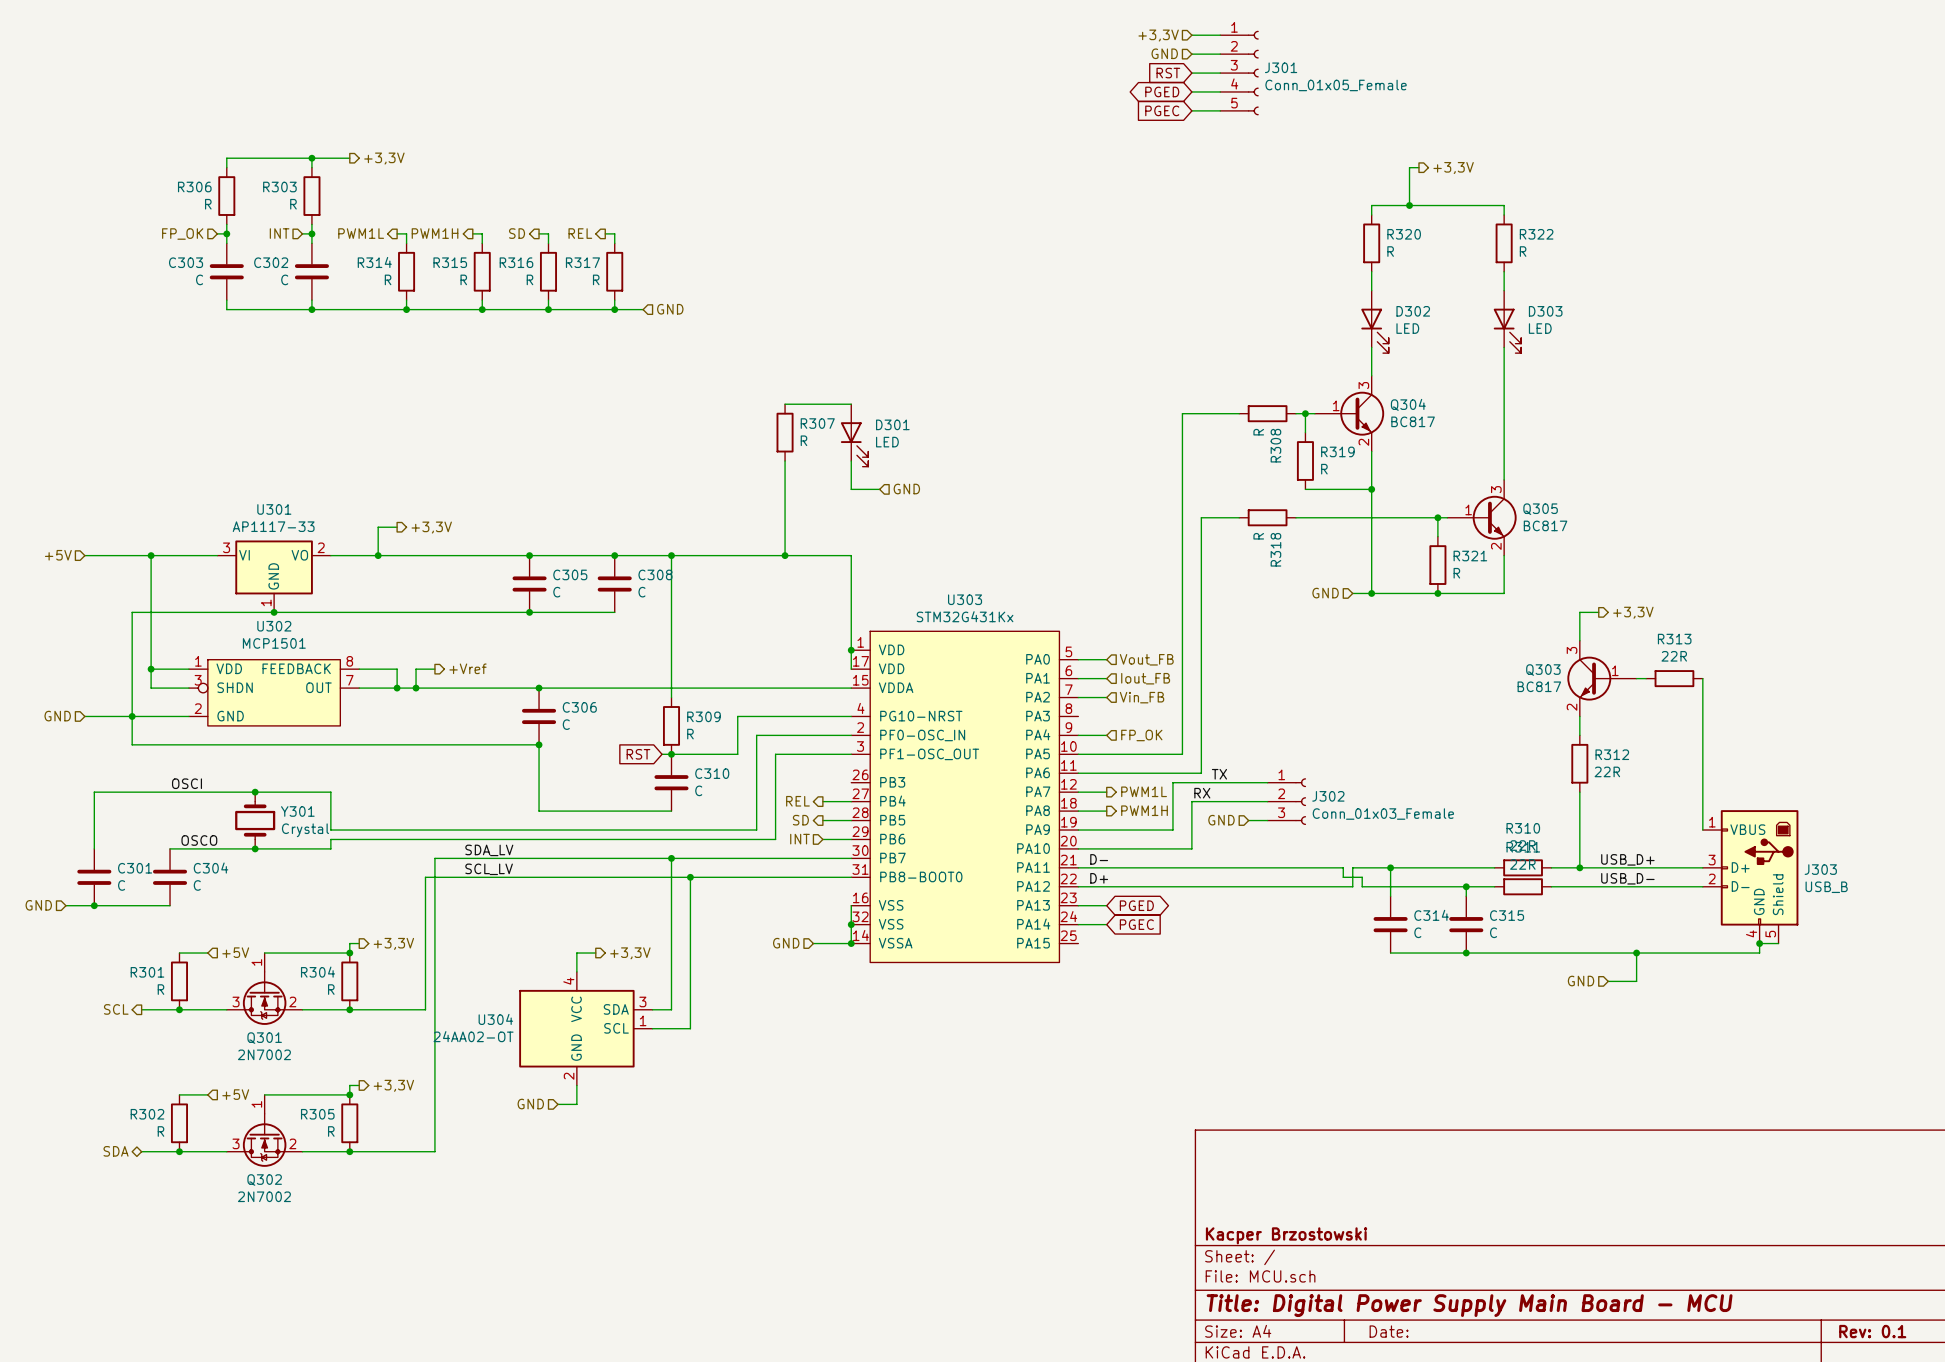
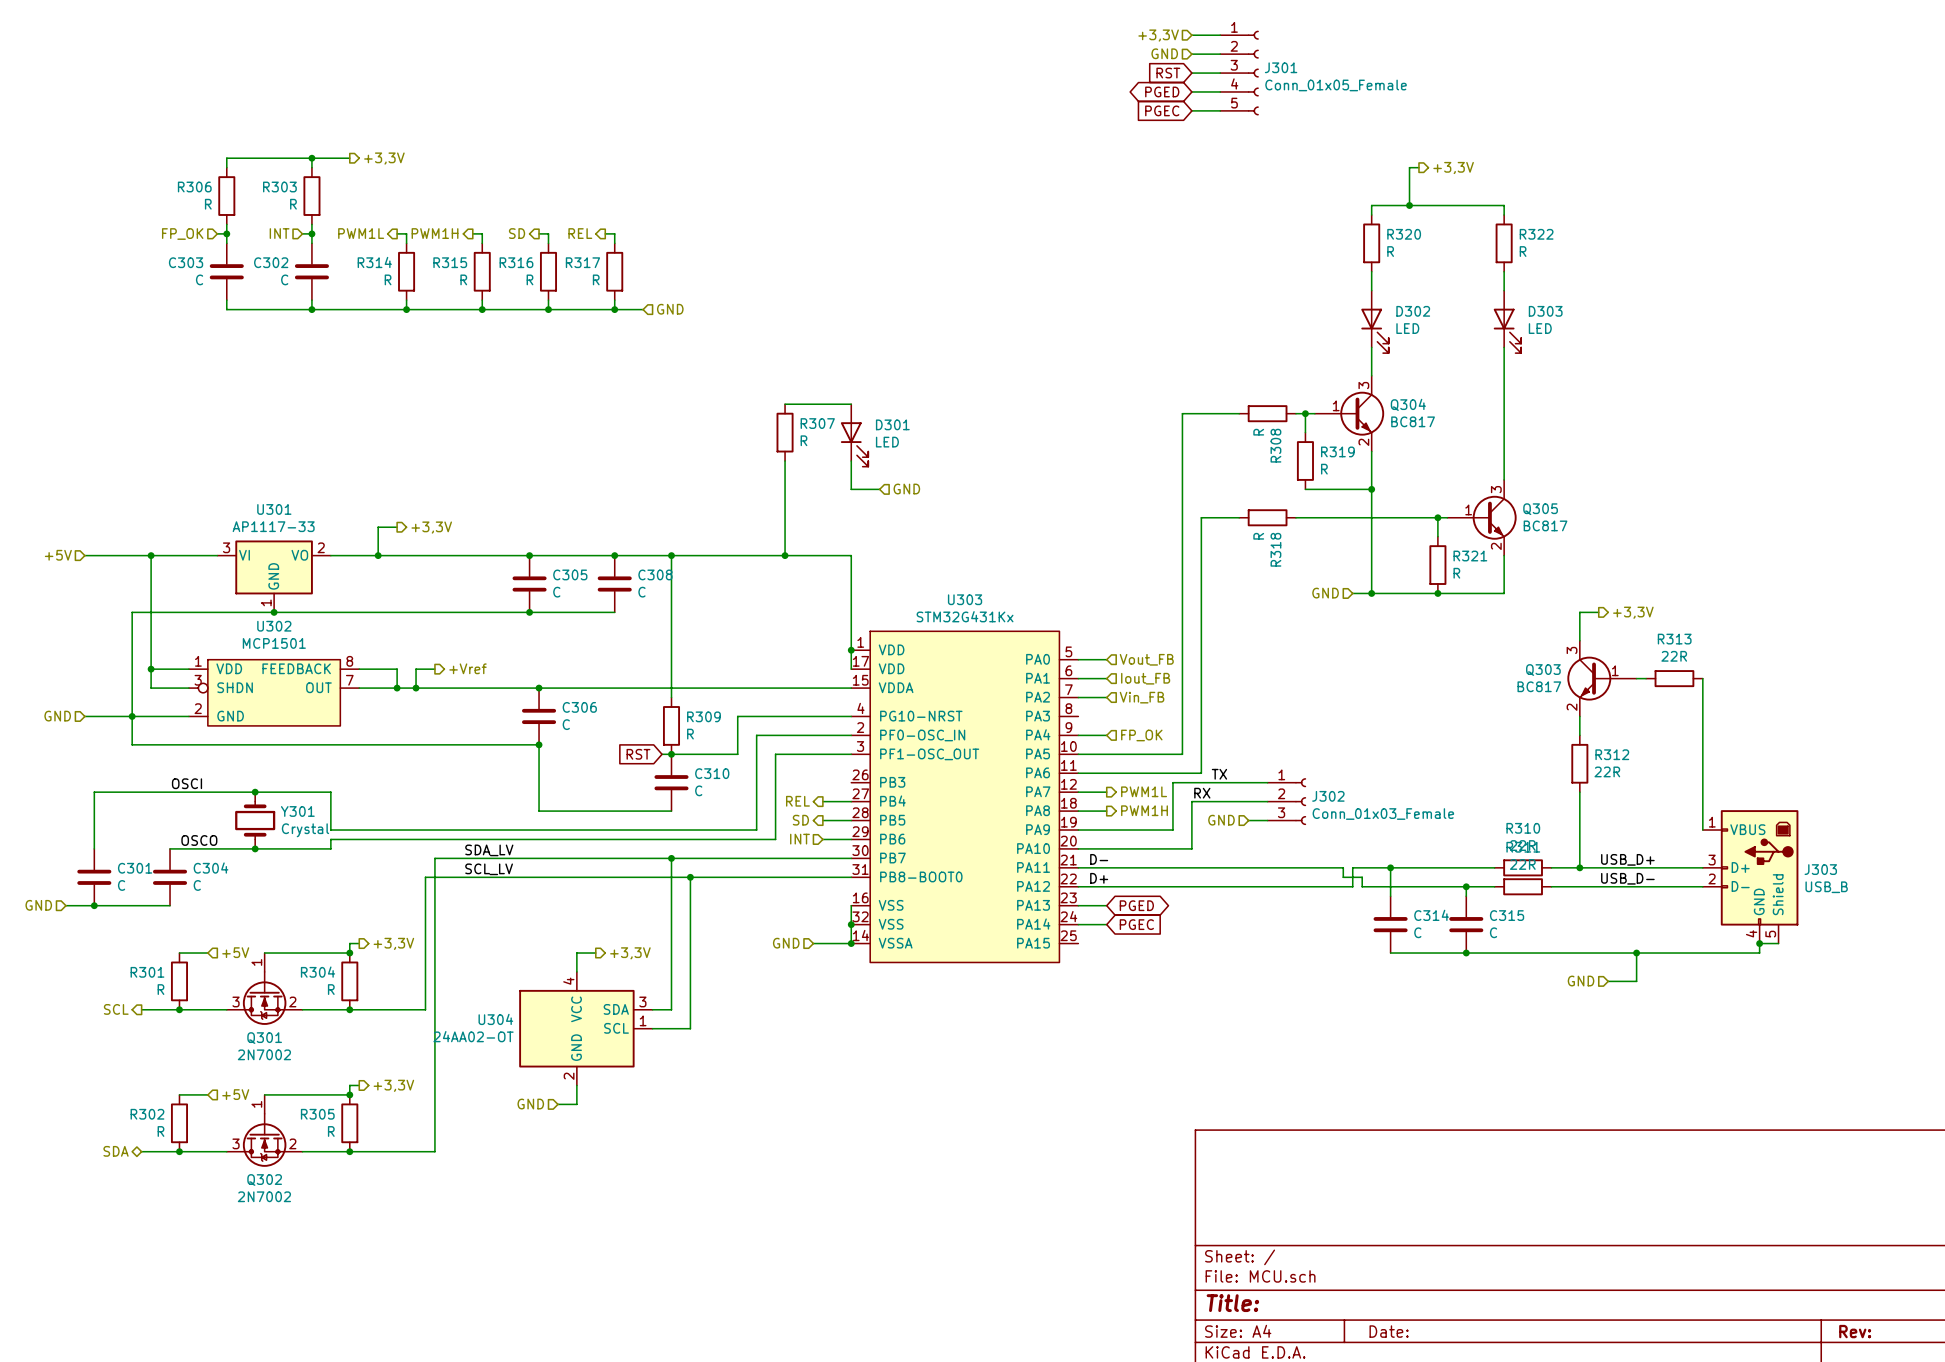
title block: Kacper Brzostowski (1286, 1235) -> none
title block: Title: Digital Power Supply Main Board - MCU (1469, 1305) -> Title: (1232, 1303)
title block: Rev: 0.1 (1872, 1331) -> Rev: (1855, 1331)

